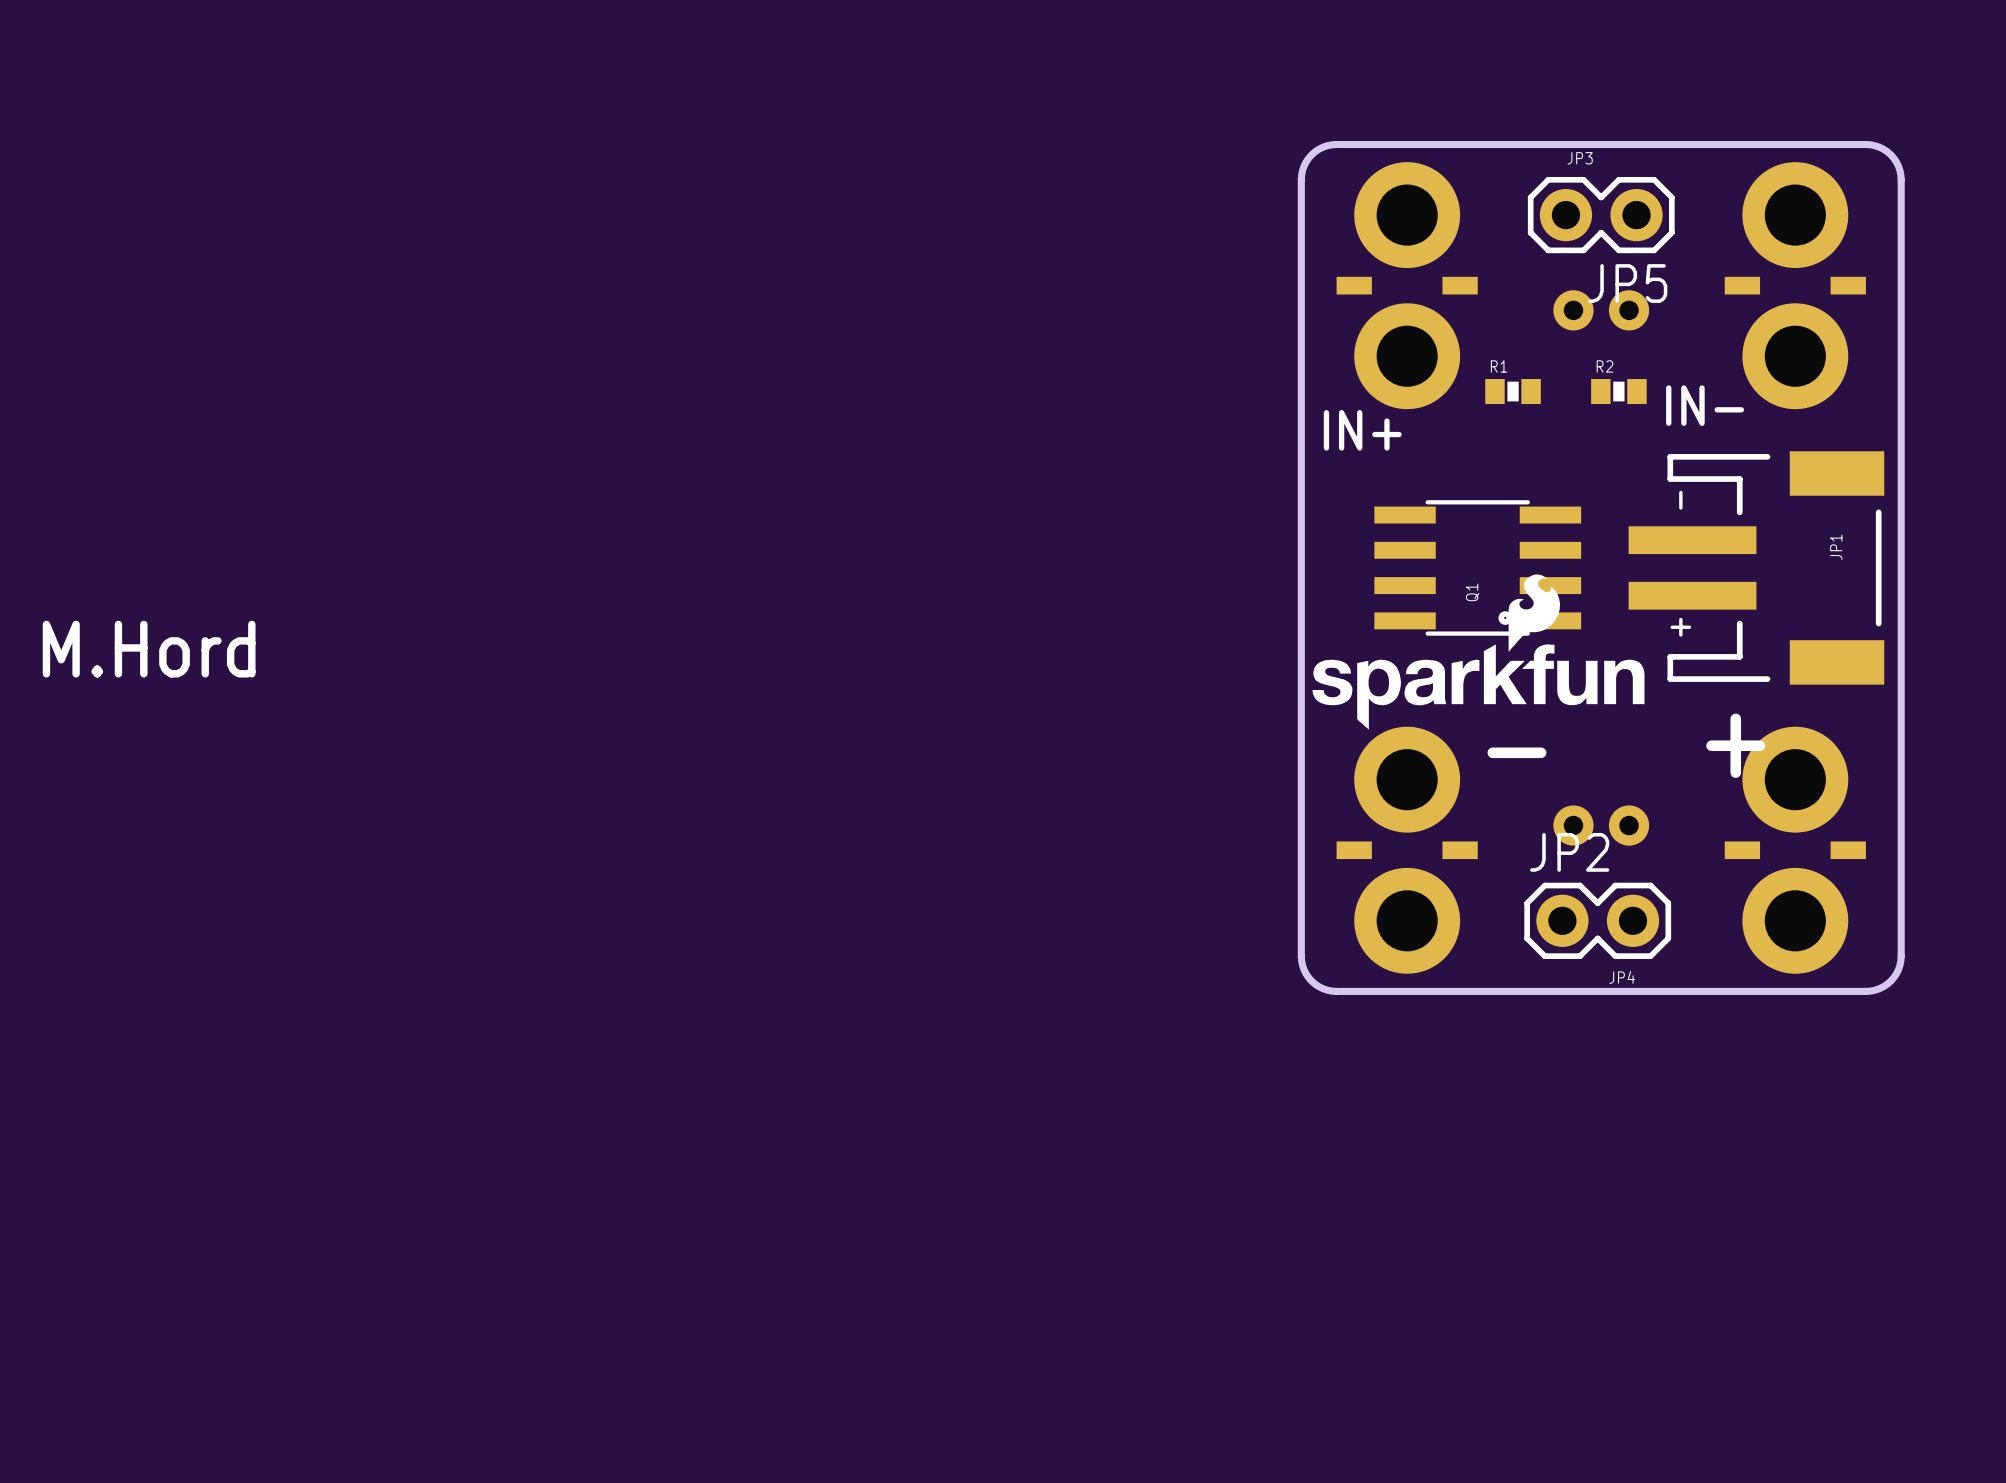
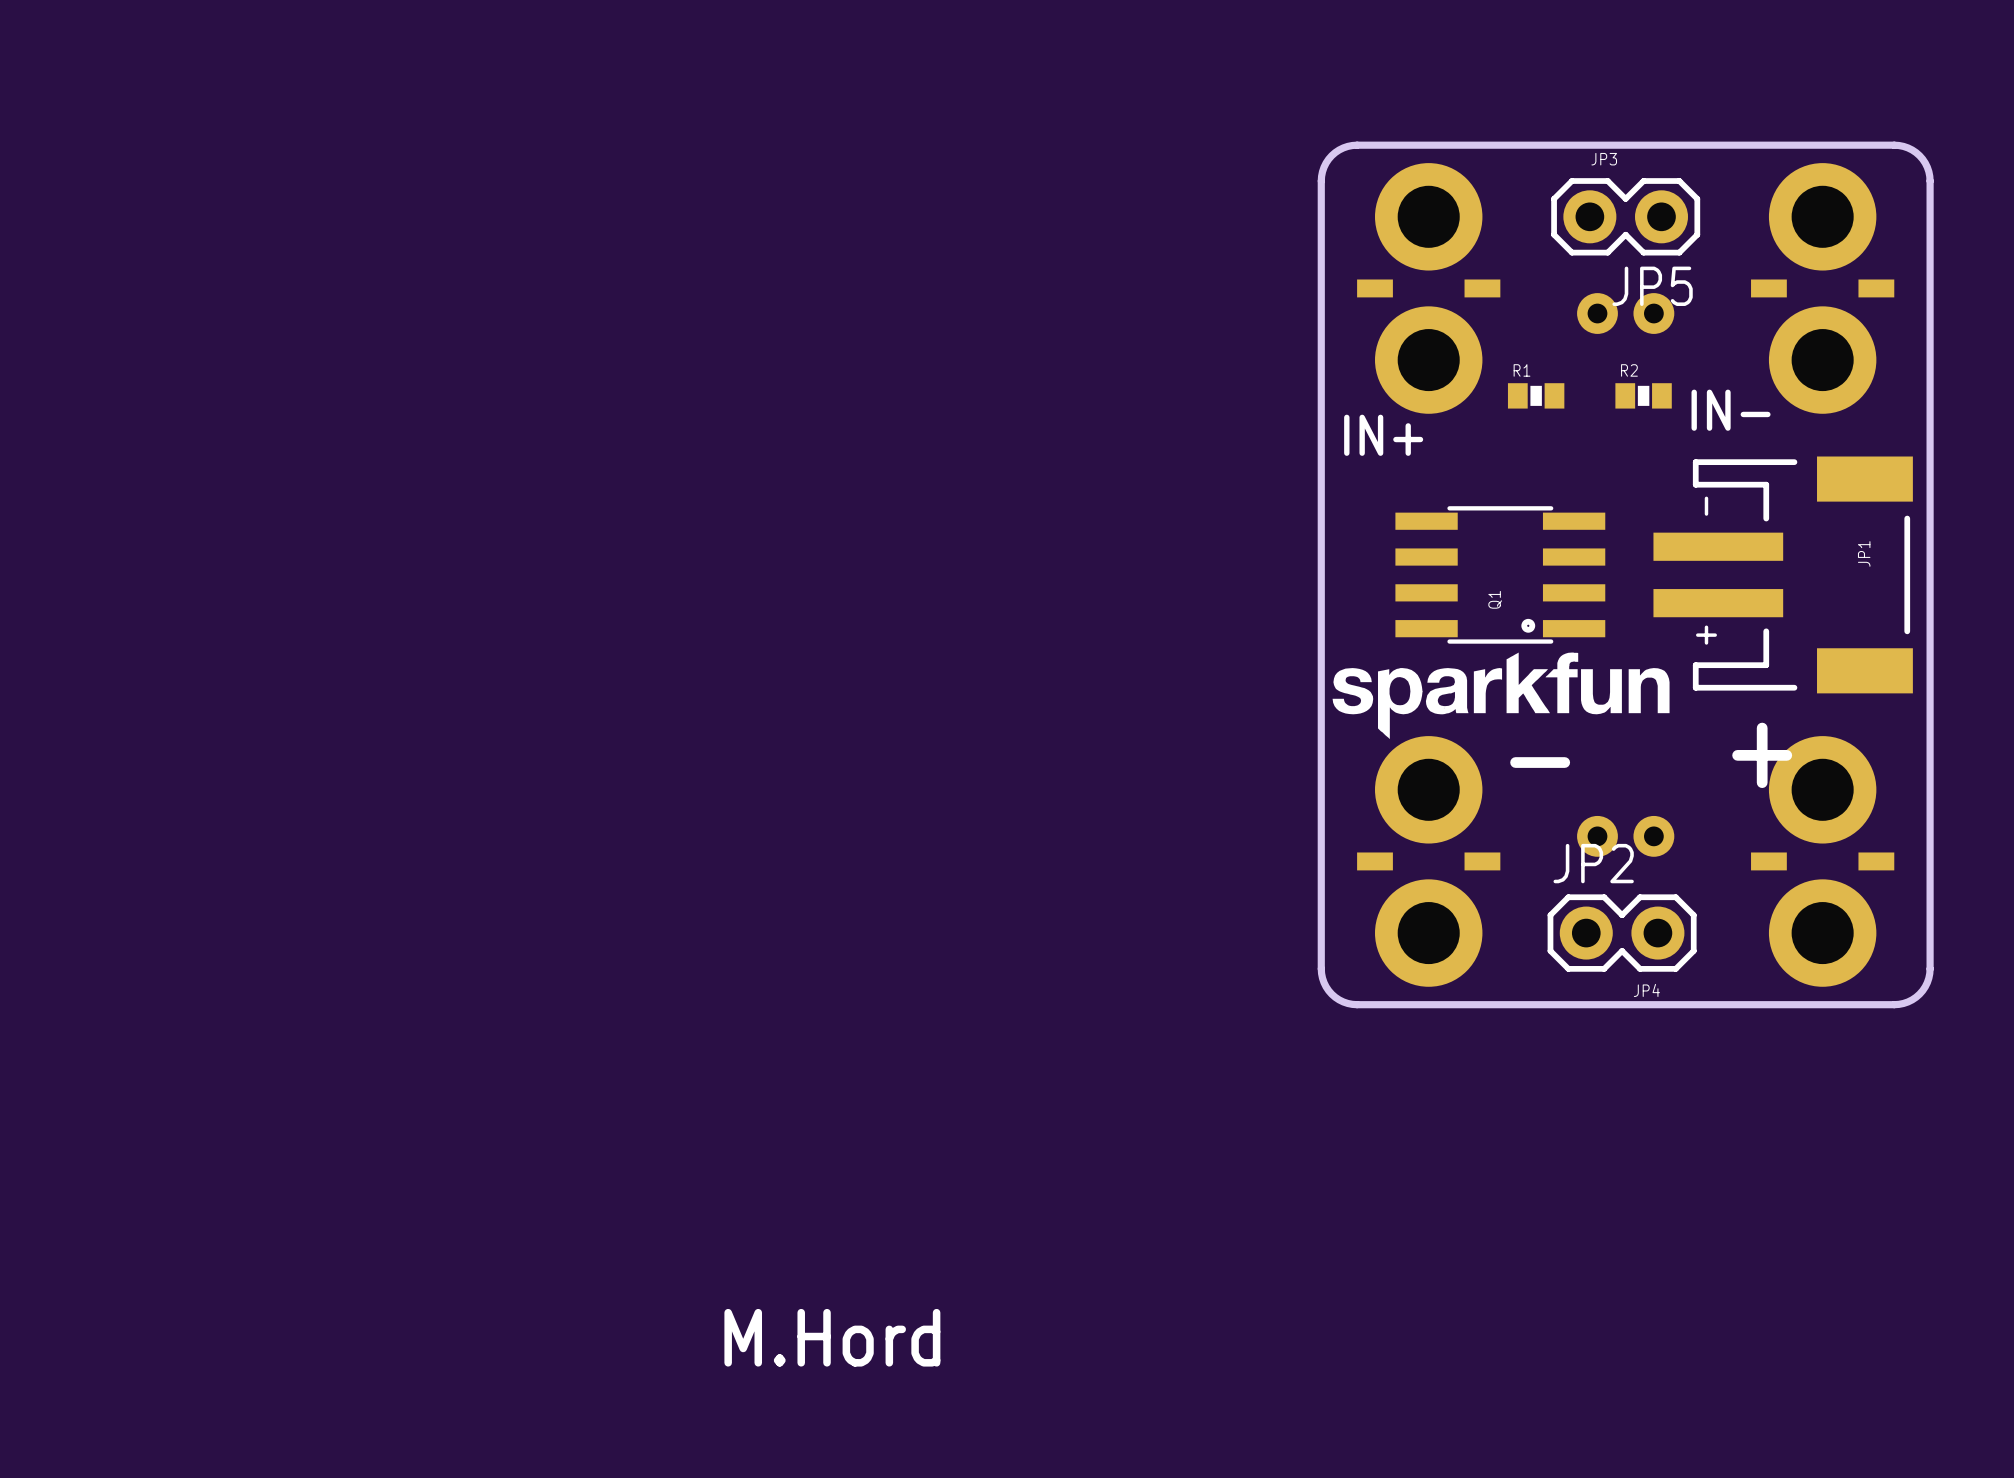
drawing: [1508, 574, 1561, 653] -> none
text: M.Hord (149, 649) -> none
text: none -> M.Hord (832, 1337)

